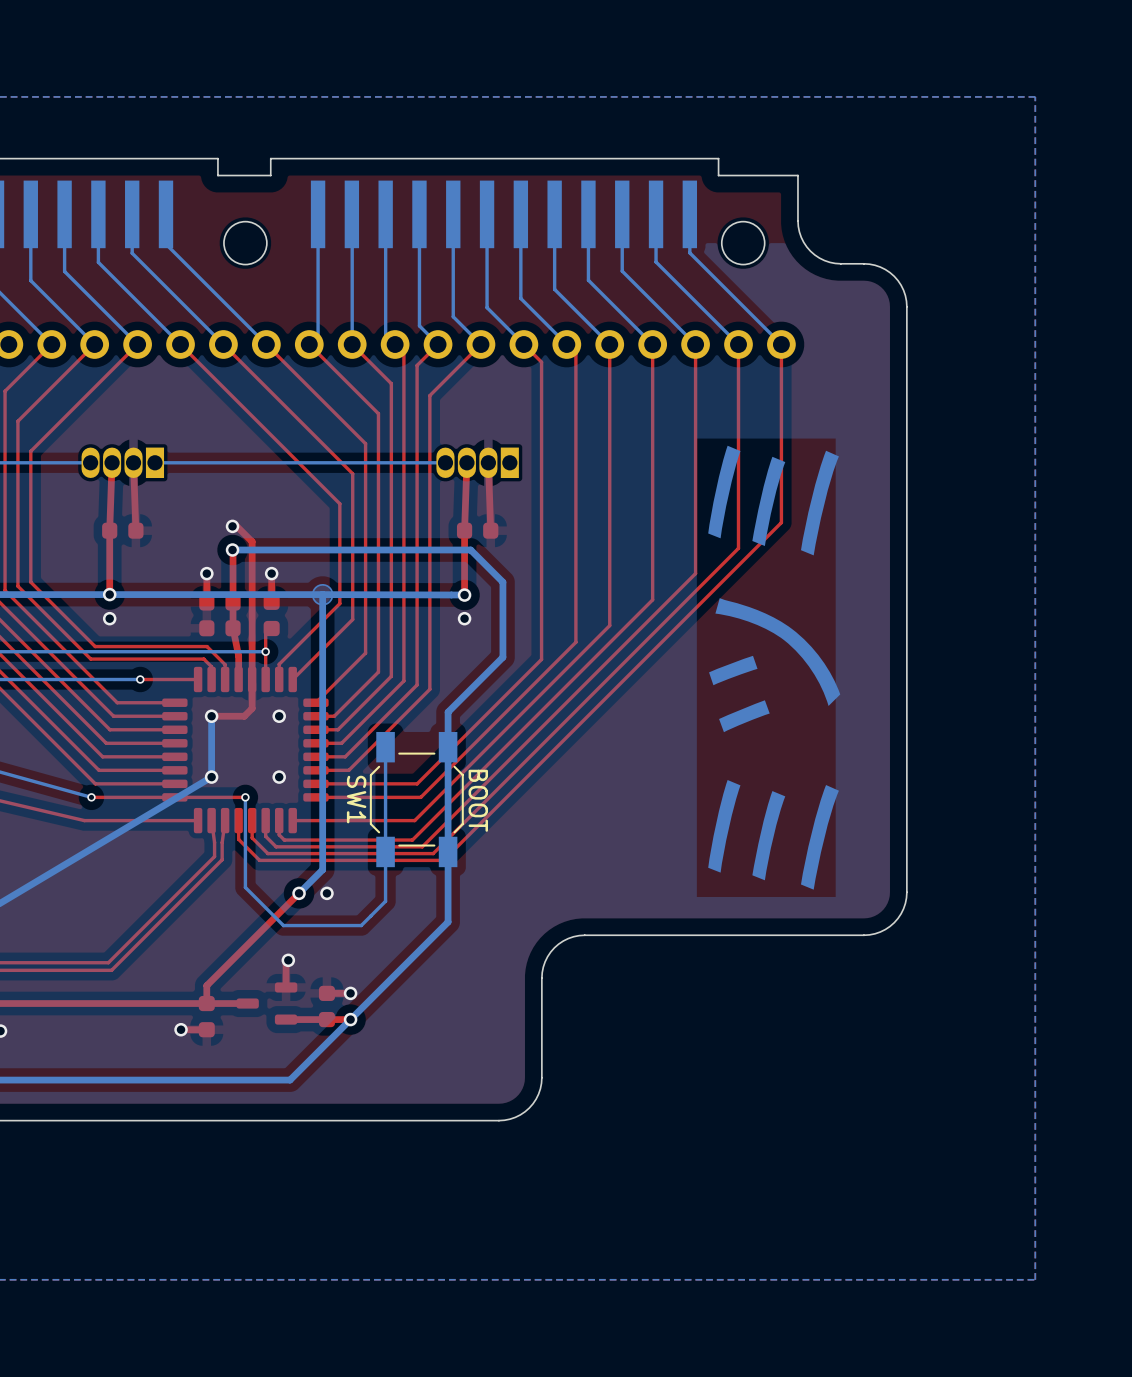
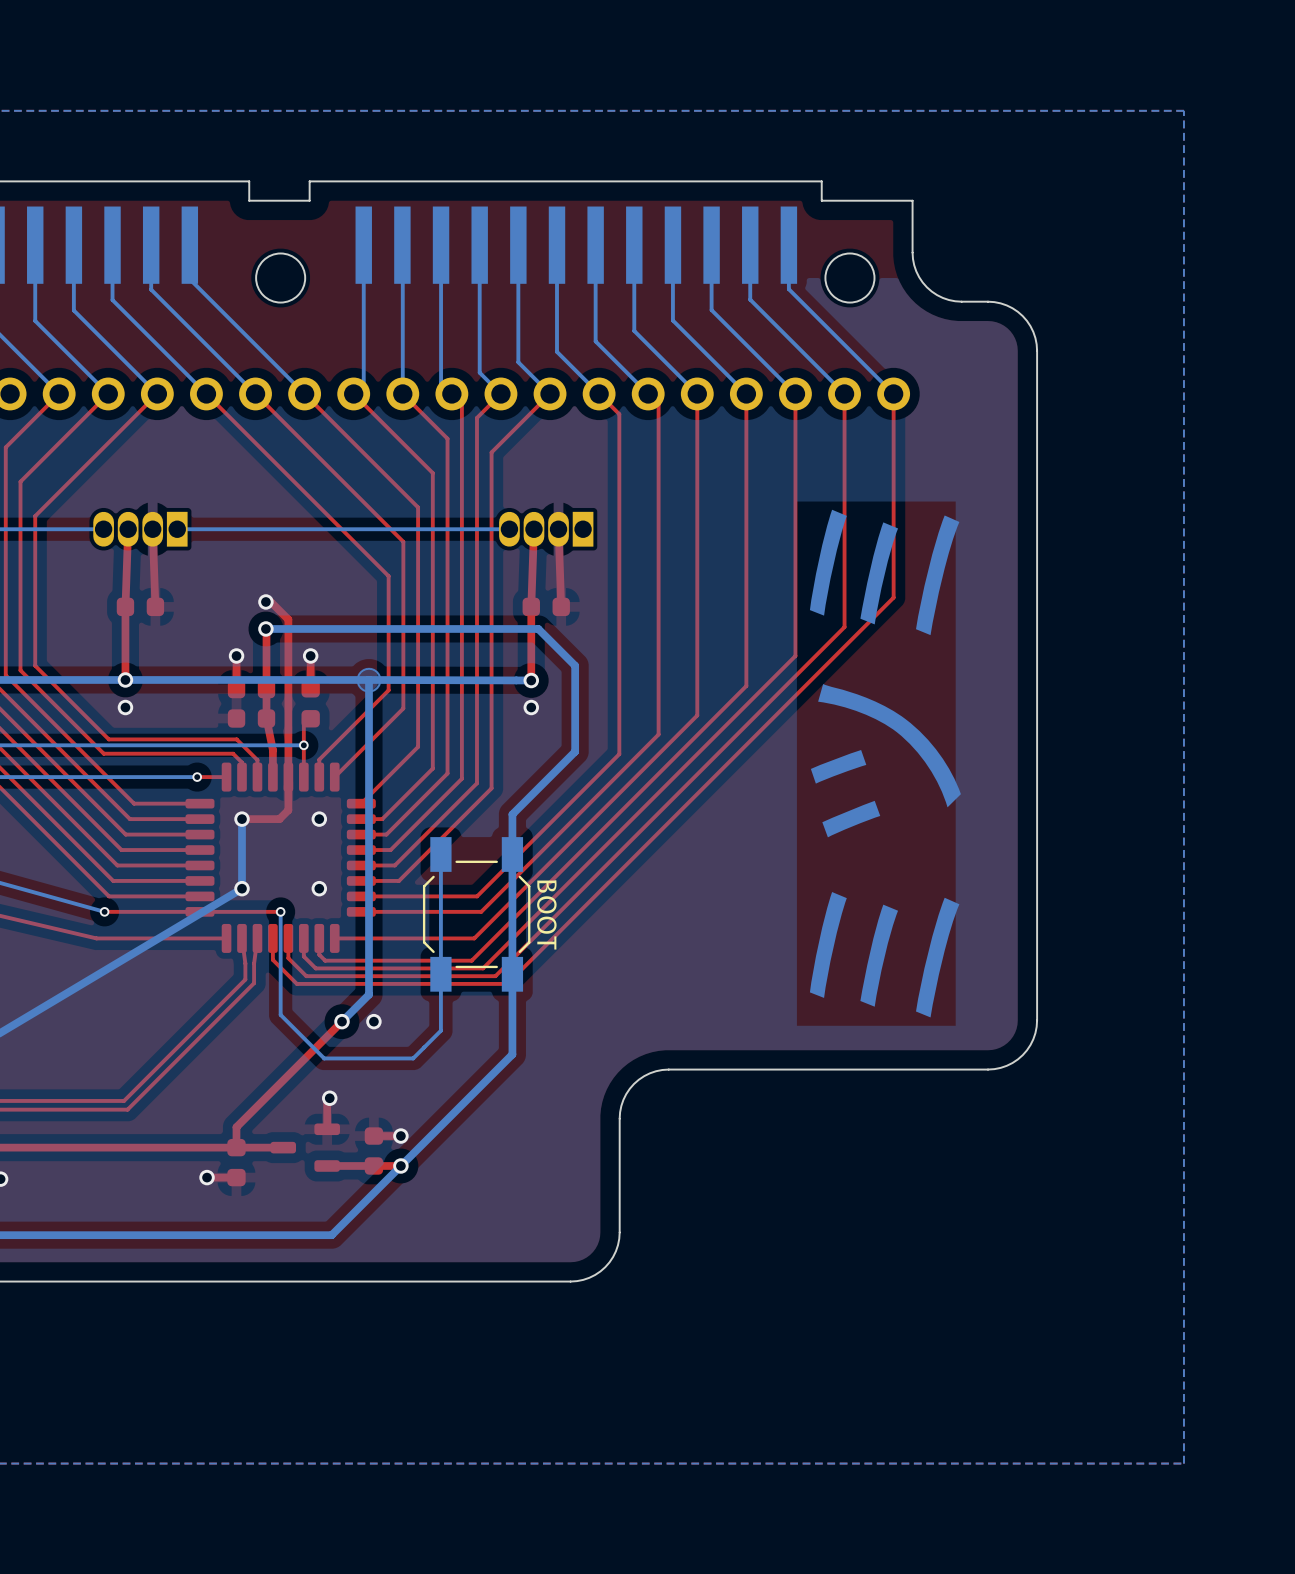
via position: (140, 679) -> (197, 777)
top track: (172, 679) (140, 679) -> none
bottom track: none -> (197, 777) (160, 777)
SW1 name: SW1 (356, 799) -> none

